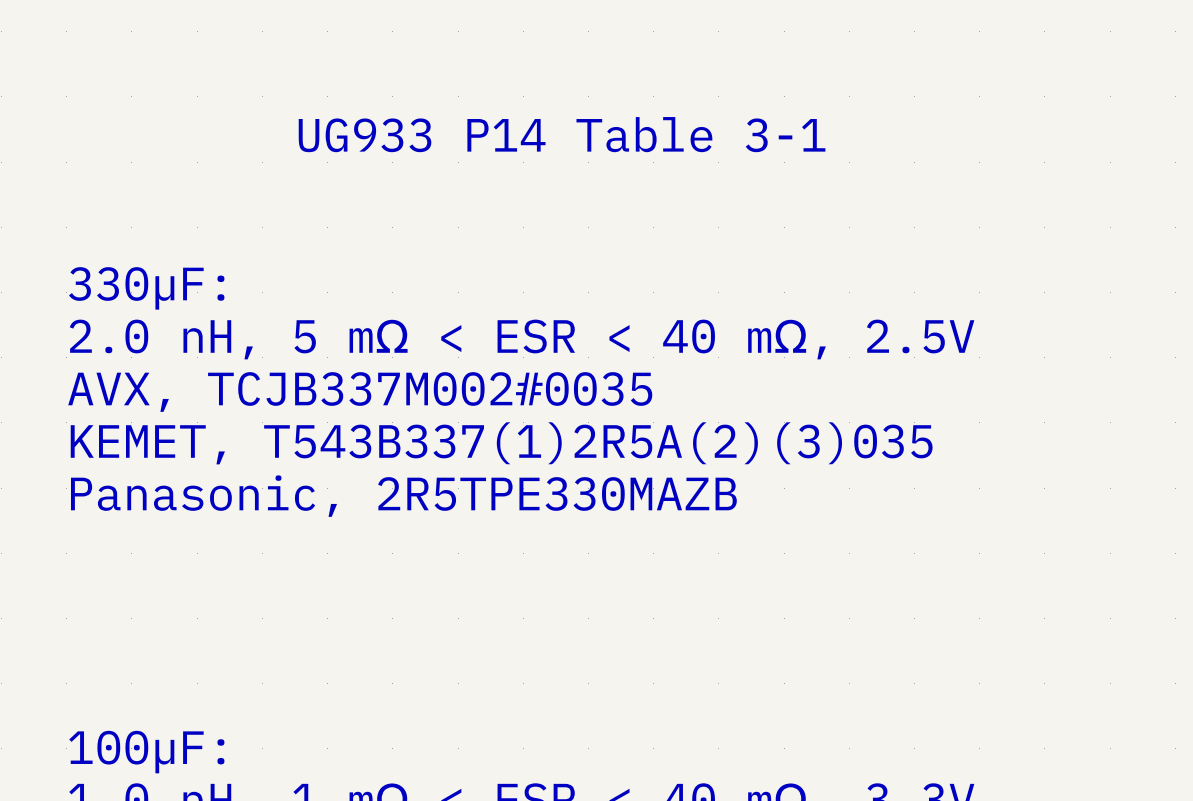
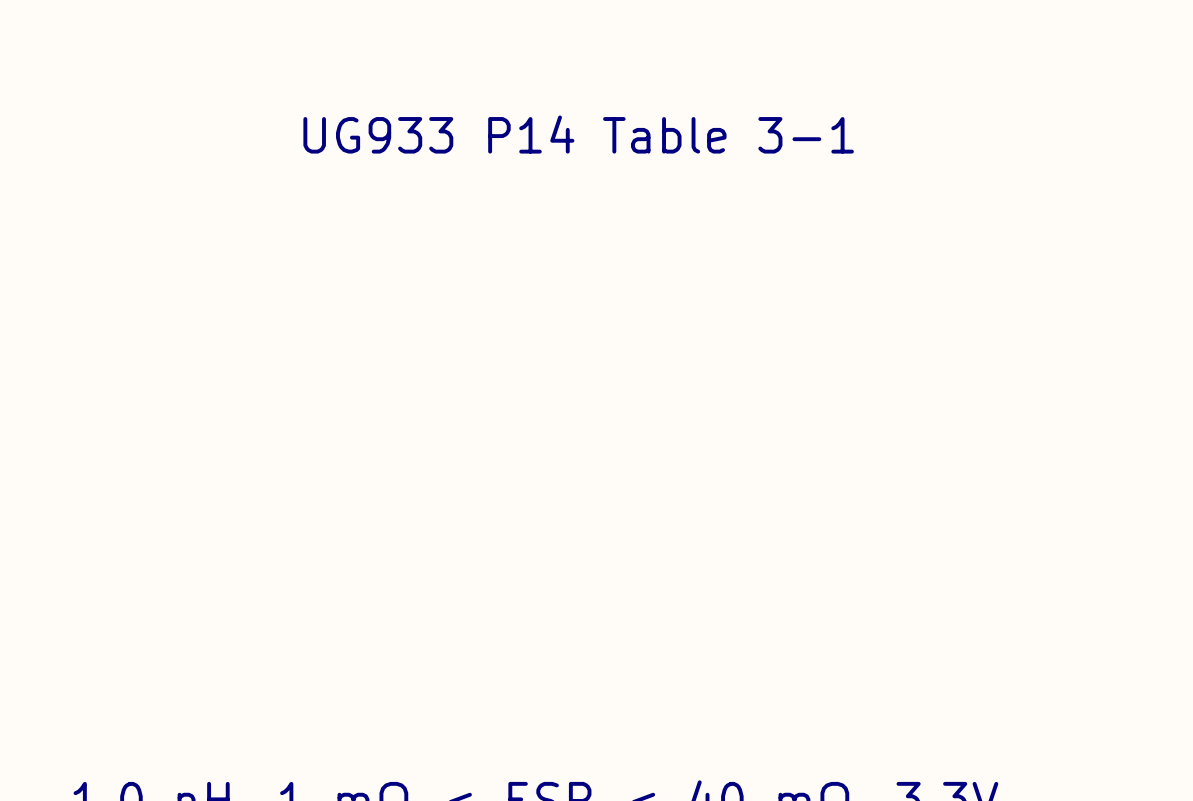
text: 330µF: (146, 288) -> none
text: 2.0 nH, 5 mΩ < ESR < 40 mΩ, 2.5V (522, 339) -> none
text: AVX, TCJB337M002#0035 (360, 392) -> none
text: KEMET, T543B337(1)2R5A(2)(3)035 (501, 443) -> none
text: Panasonic, 2R5TPE330MAZB (403, 496) -> none
text: 100µF: (146, 752) -> none

